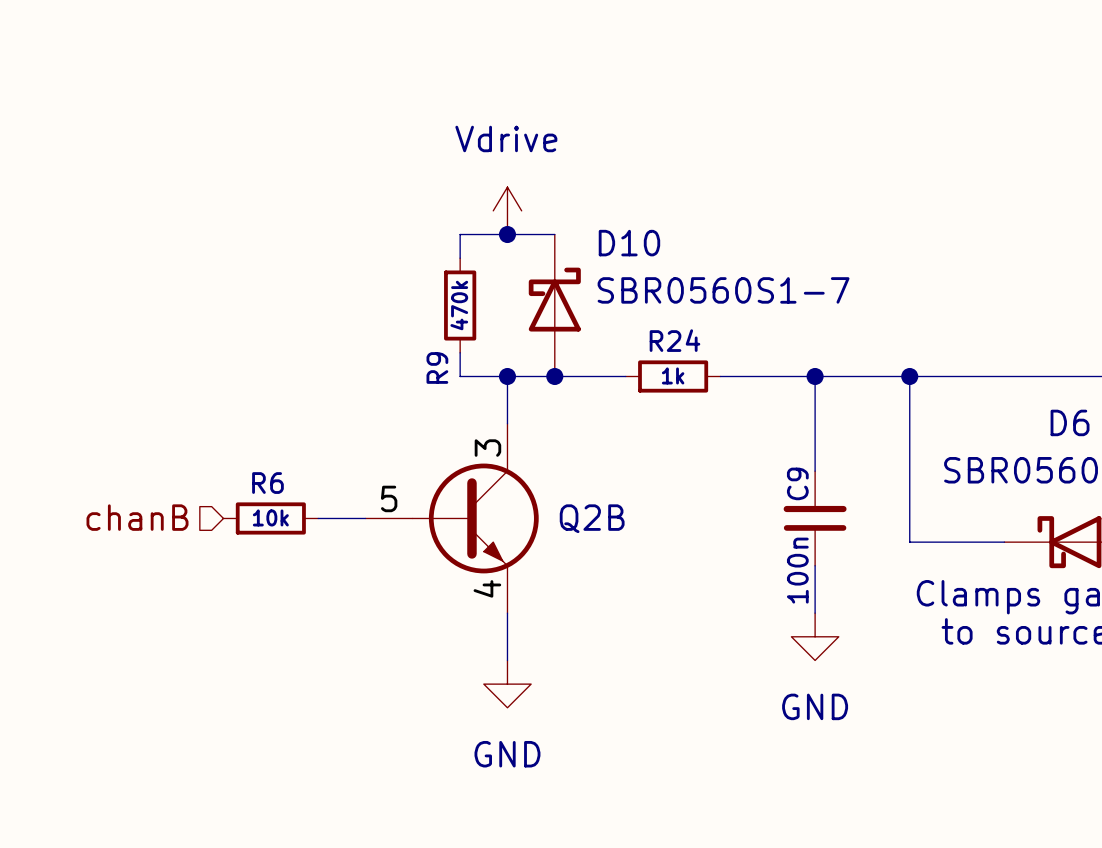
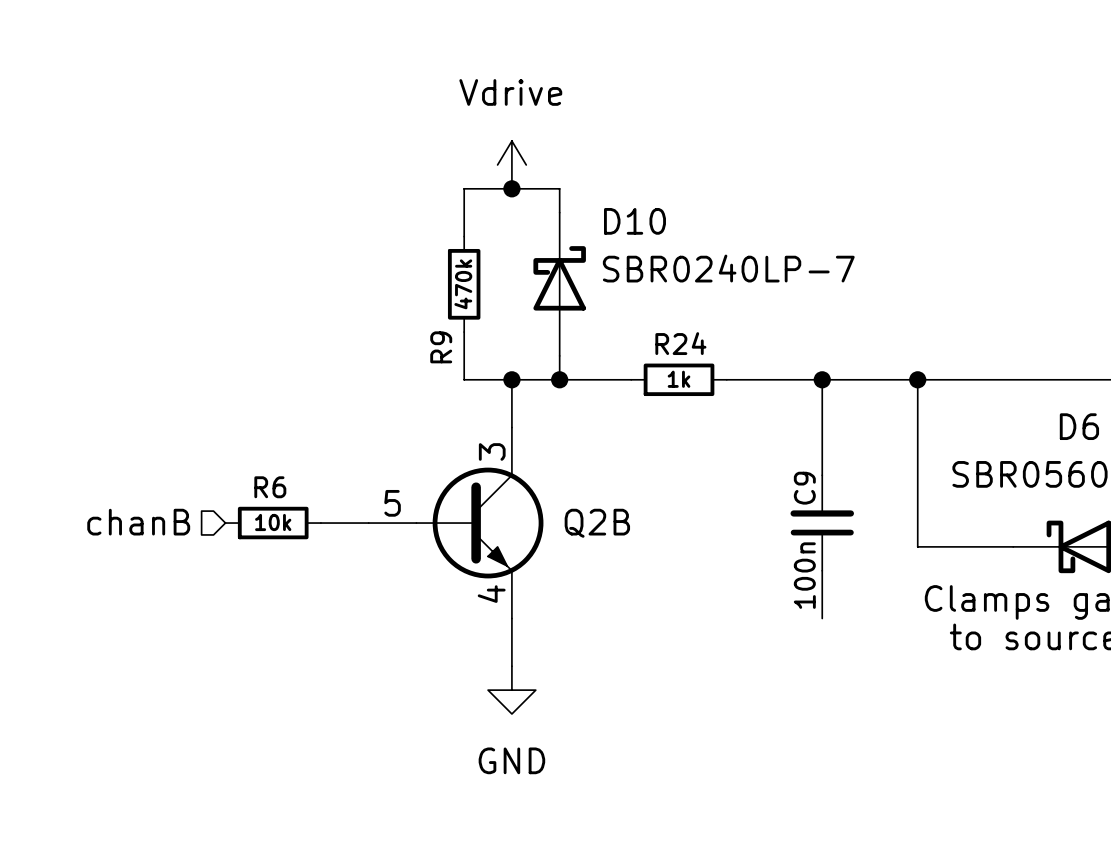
power symbol position: Vdrive (507, 210) -> Vdrive (511, 164)
wire: none -> (559, 212) (559, 188) (464, 188) (464, 236)
junction position: (507, 234) -> (511, 188)
wire: (554, 234) (460, 234) (460, 258) -> none
D10 value: SBR0560S1-7 (723, 290) -> SBR0240LP-7 (728, 268)
R9 position: (460, 305) -> (464, 284)
D10 position: (554, 305) -> (559, 284)
power symbol: GND (815, 636) -> none

